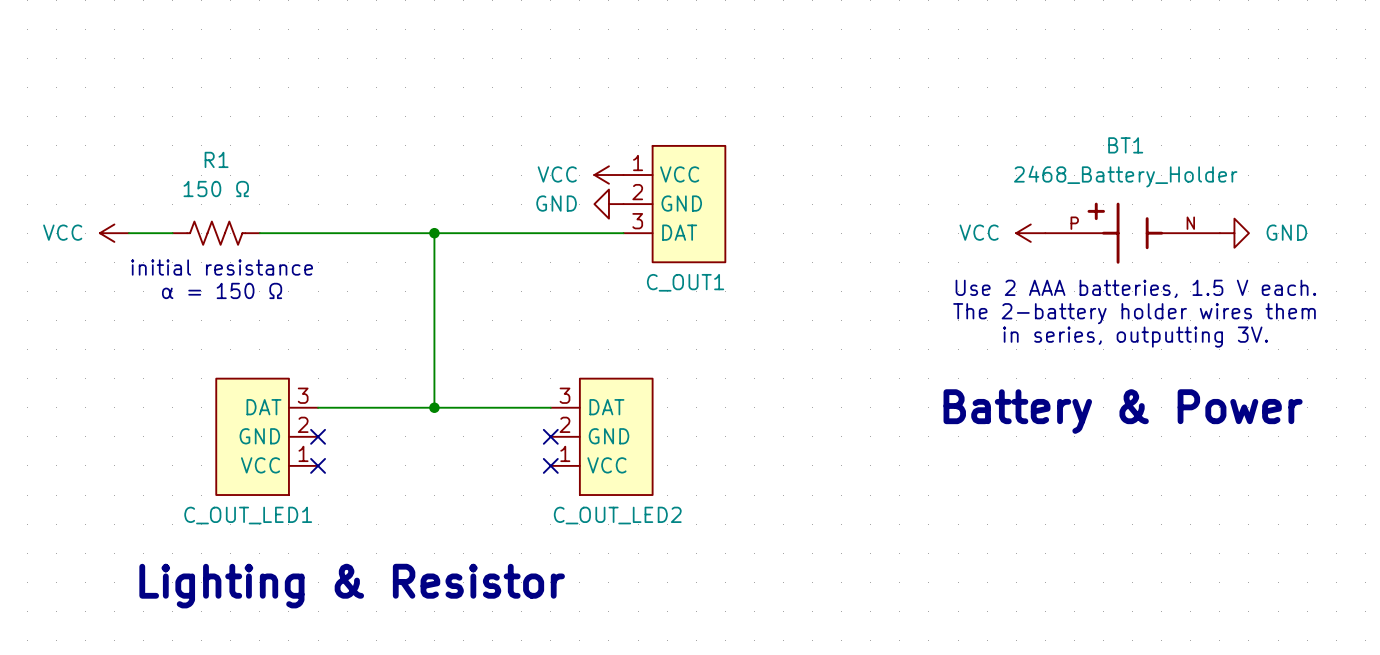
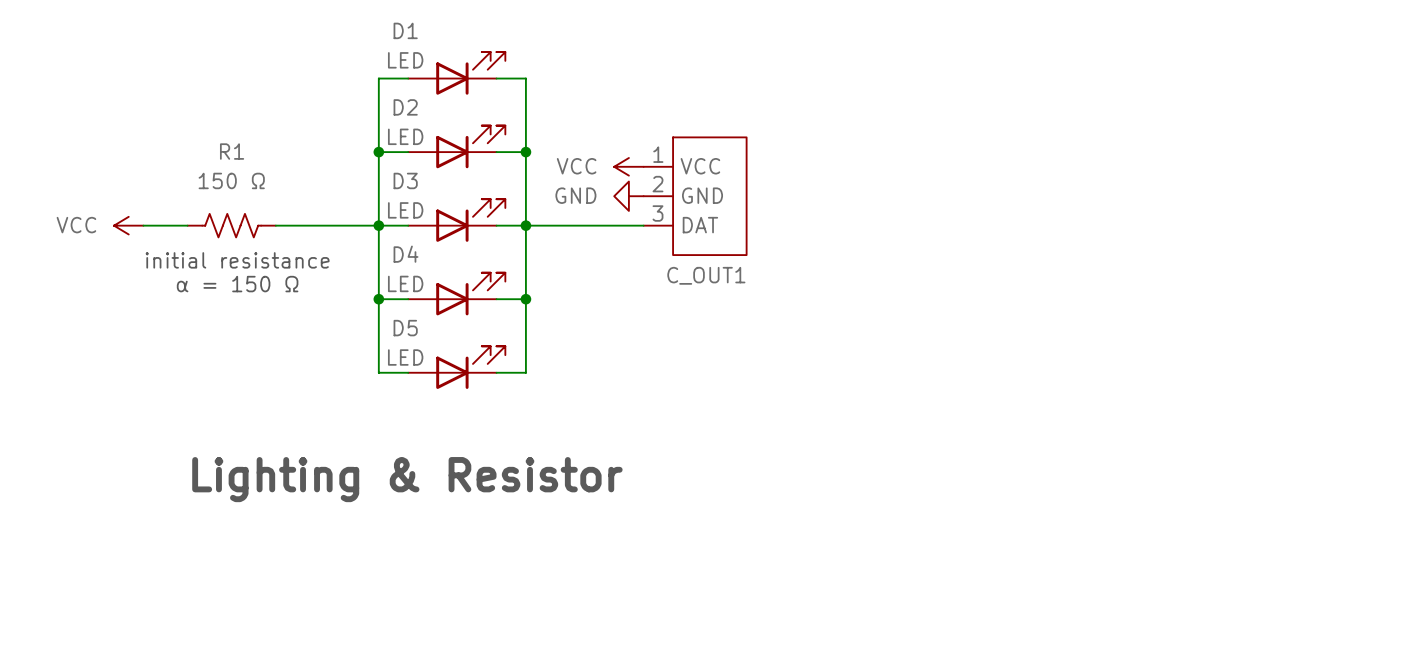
D1: none -> LED (456, 73)
wire: none -> (408, 78) (378, 78) (378, 372) (408, 372)
wire: none -> (496, 78) (525, 78) (525, 372) (496, 372)
D2: none -> LED (456, 146)
wire: none -> (378, 152) (408, 152)
junction: none -> (378, 152)
wire: none -> (496, 152) (525, 152)
junction: none -> (525, 152)
D3: none -> LED (456, 220)
junction: none -> (378, 225)
wire: (434, 233) (434, 407) -> none
junction: (434, 233) -> none
junction: none -> (525, 225)
power symbol: VCC (1030, 233) -> none
BT1: 2468_Battery_Holder (1132, 233) -> none
power symbol: GND (1234, 233) -> none
text: Use 2 AAA batteries, 1.5 V each. (1135, 288) -> none
D4: none -> LED (456, 294)
wire: none -> (378, 299) (408, 299)
junction: none -> (378, 299)
wire: none -> (496, 299) (525, 299)
junction: none -> (525, 299)
text: The 2-battery holder wires them (1134, 313) -> none
text: in series, outputting 3V. (1135, 337) -> none
D5: none -> LED (456, 367)
wire: (318, 407) (550, 407) -> none
junction: (434, 407) -> none
text: Battery & Power (1123, 411) -> none
C_OUT_LED1: (267, 436) -> none
no-connect mark: (318, 436) -> none
no-connect mark: (550, 436) -> none
C_OUT_LED2: (601, 436) -> none
no-connect mark: (318, 465) -> none
no-connect mark: (550, 465) -> none
text position: Lighting & Resistor (352, 586) -> Lighting & Resistor (407, 479)

